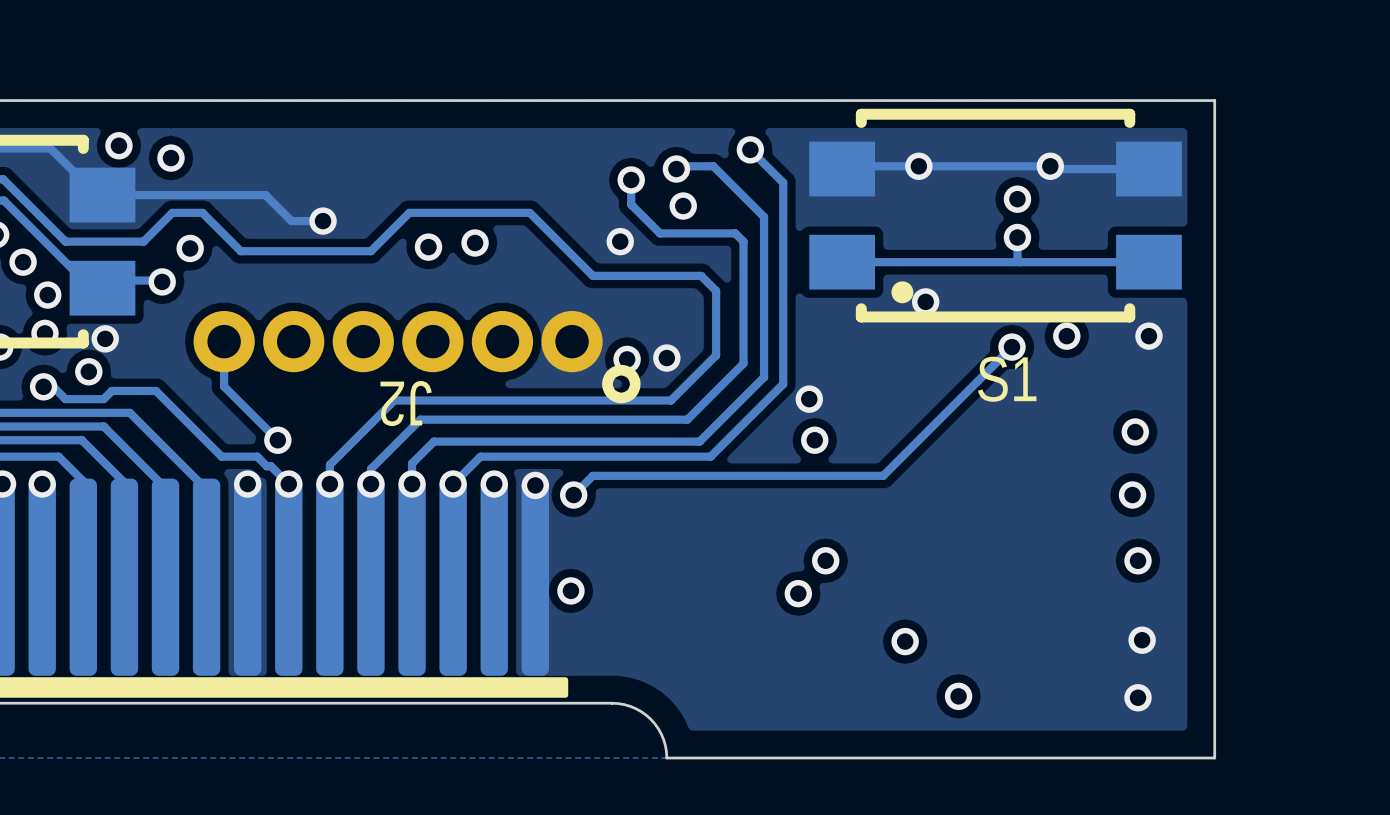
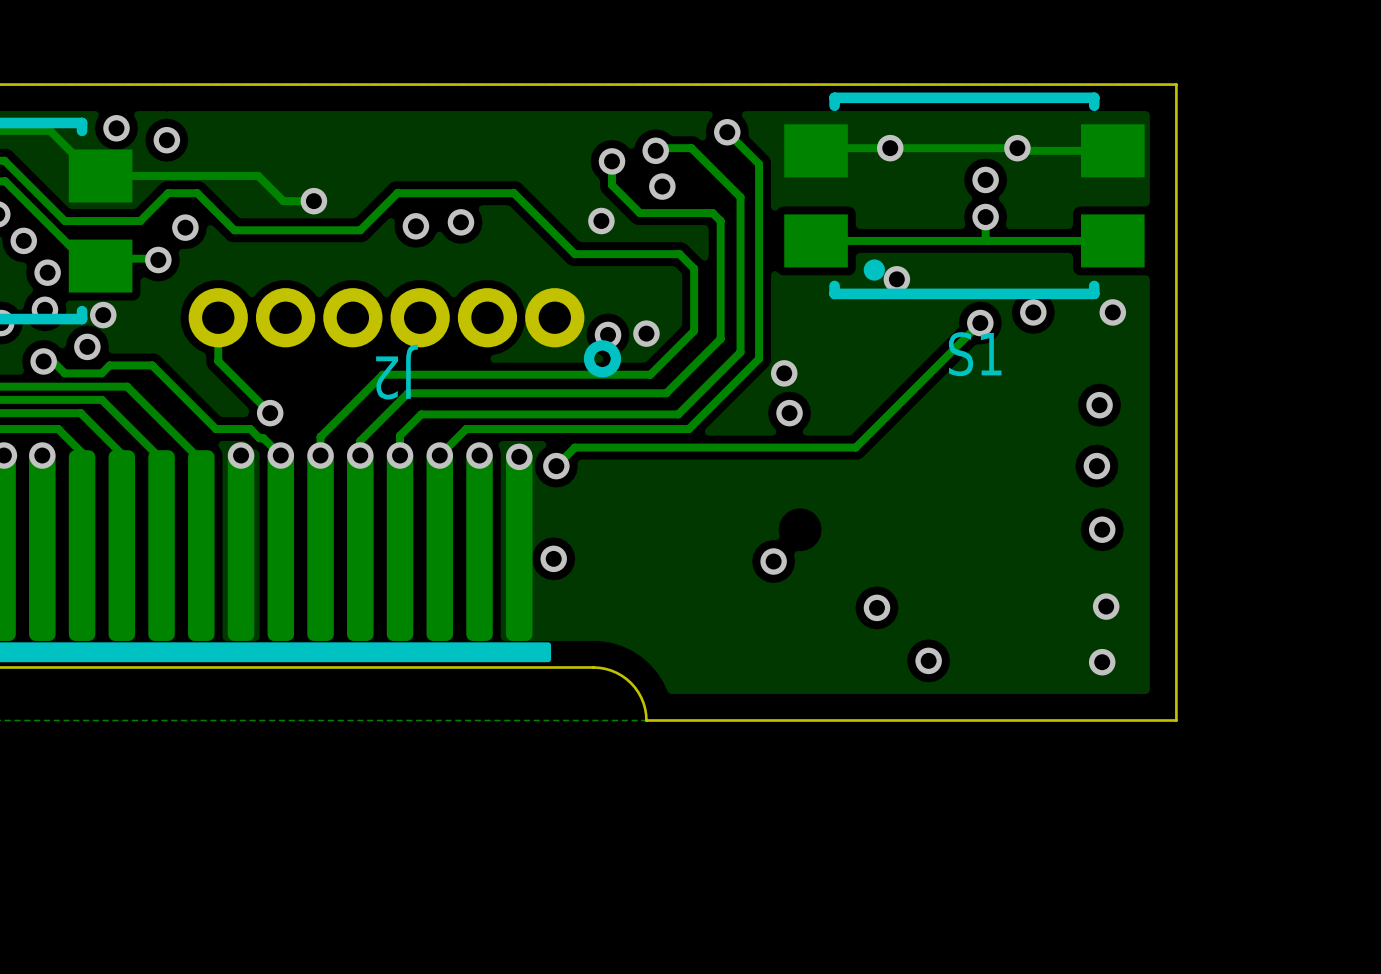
via: (825, 560) -> none

